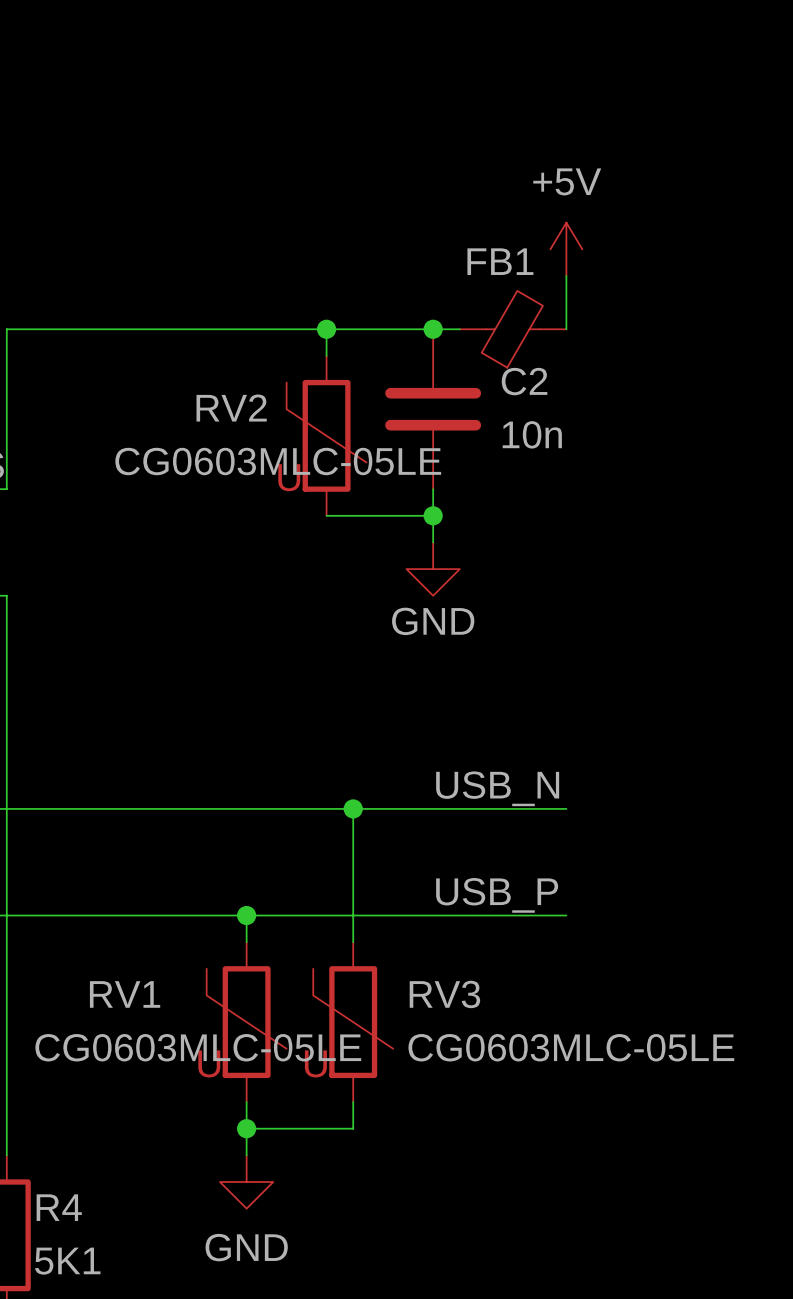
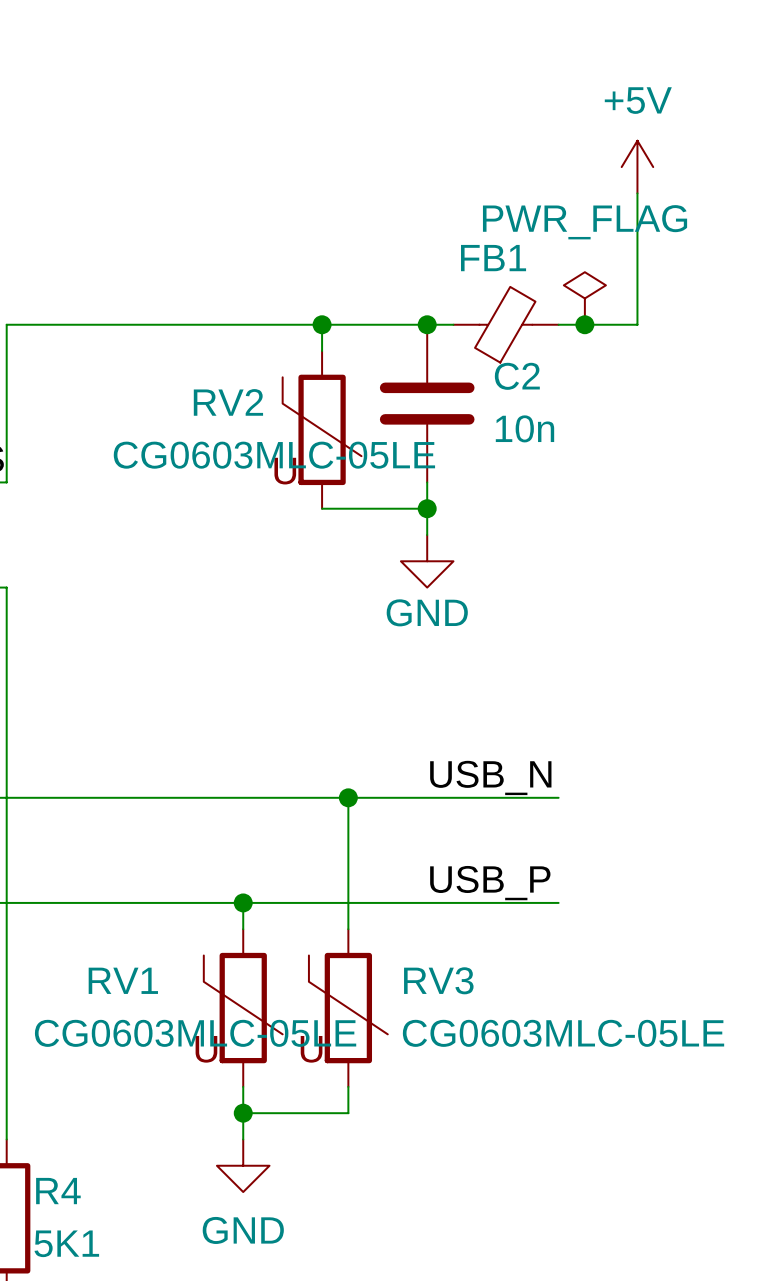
power symbol position: +5V (566, 249) -> +5V (637, 167)
wire: (566, 275) (566, 329) -> (637, 193) (637, 324) (558, 324)
power symbol: none -> PWR_FLAG (584, 298)
junction: none -> (584, 324)

